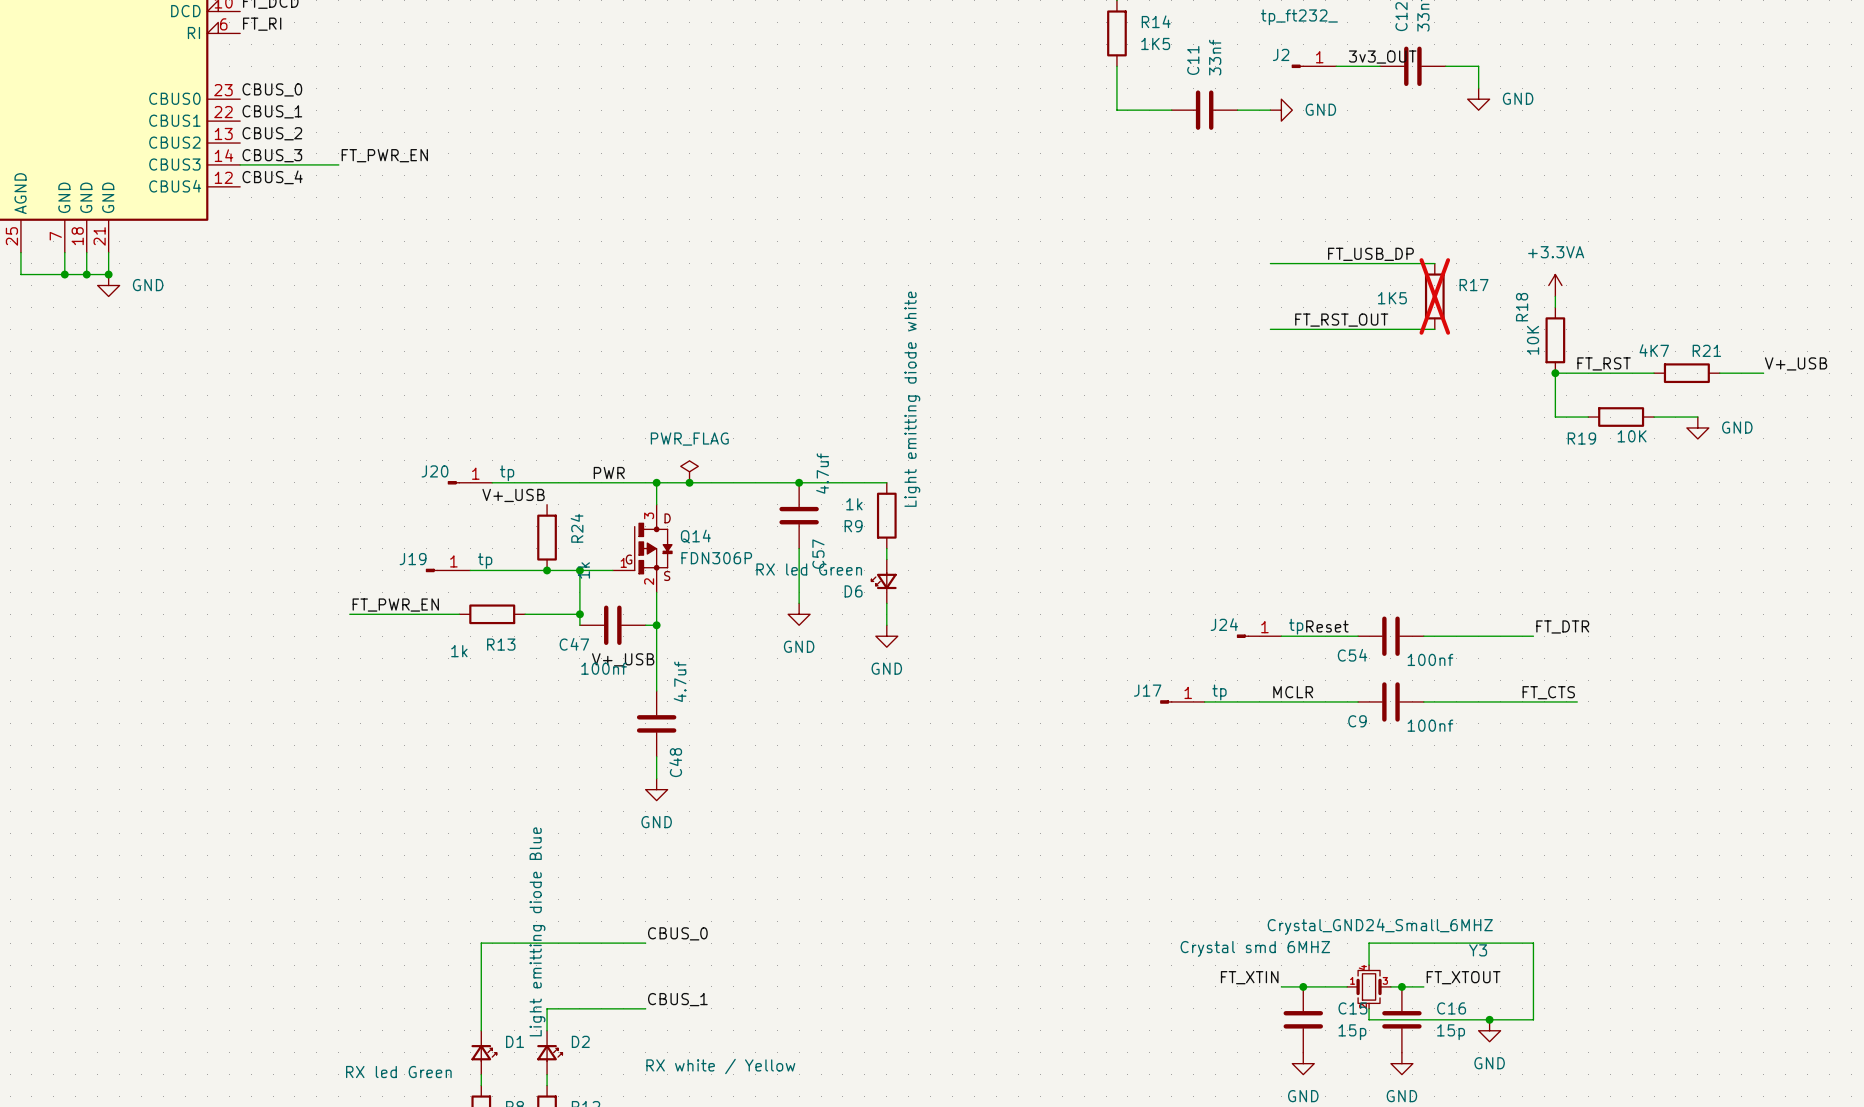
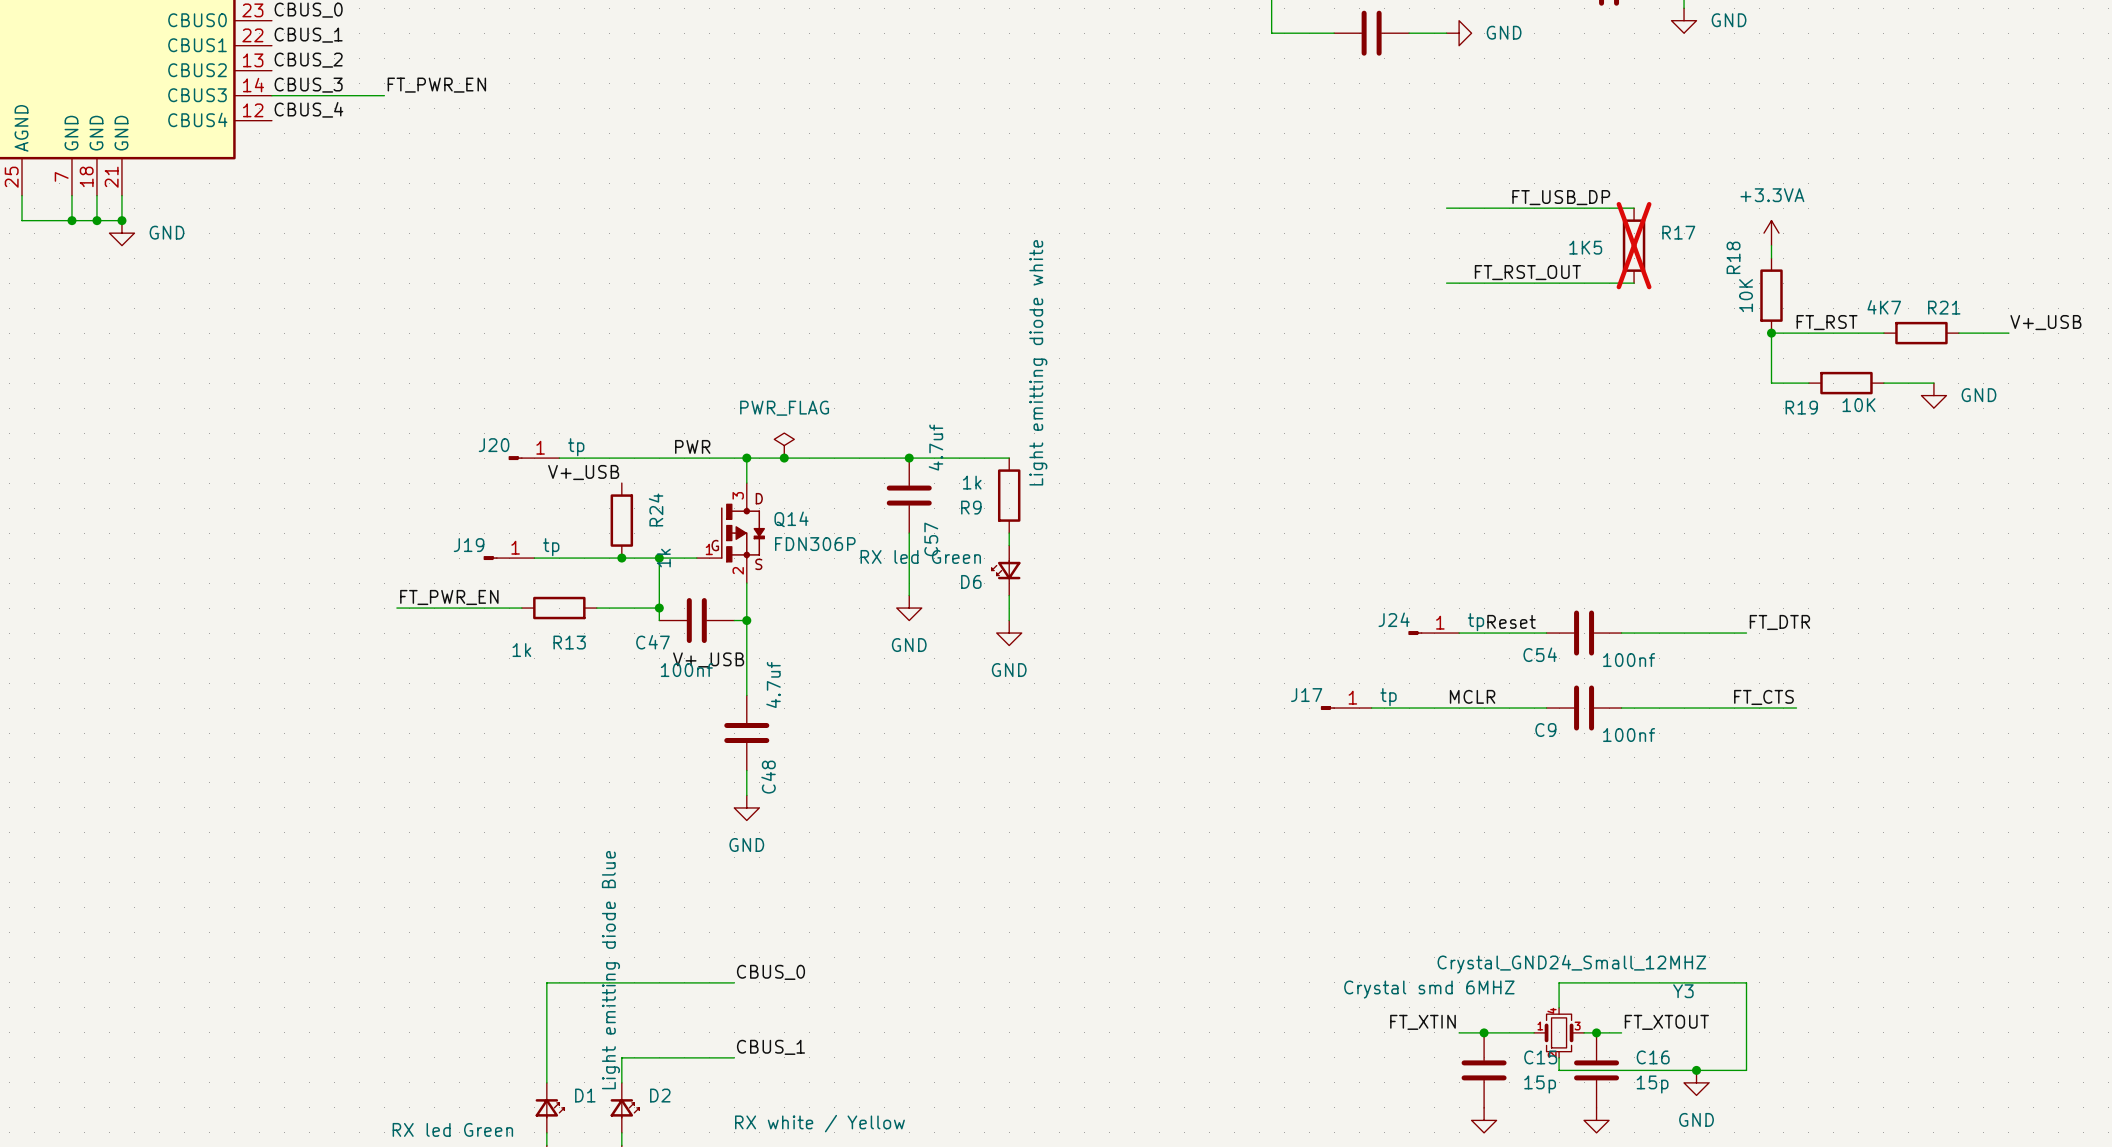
Y3 value: Crystal_GND24_Small_6MHZ (1380, 926) -> Crystal_GND24_Small_12MHZ (1571, 964)

